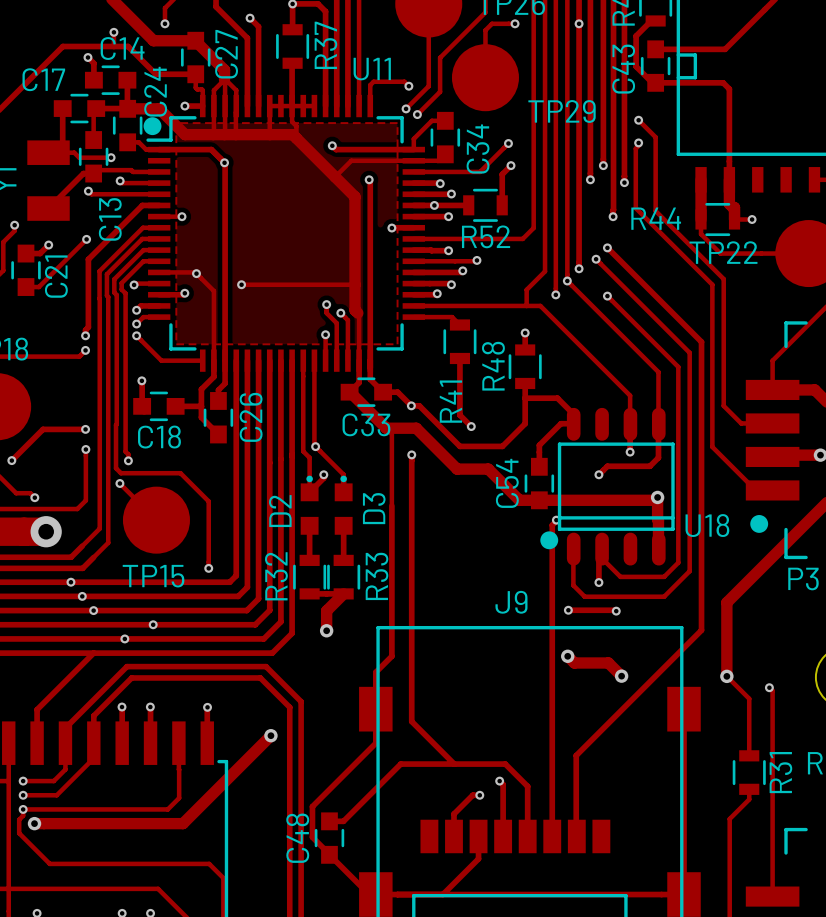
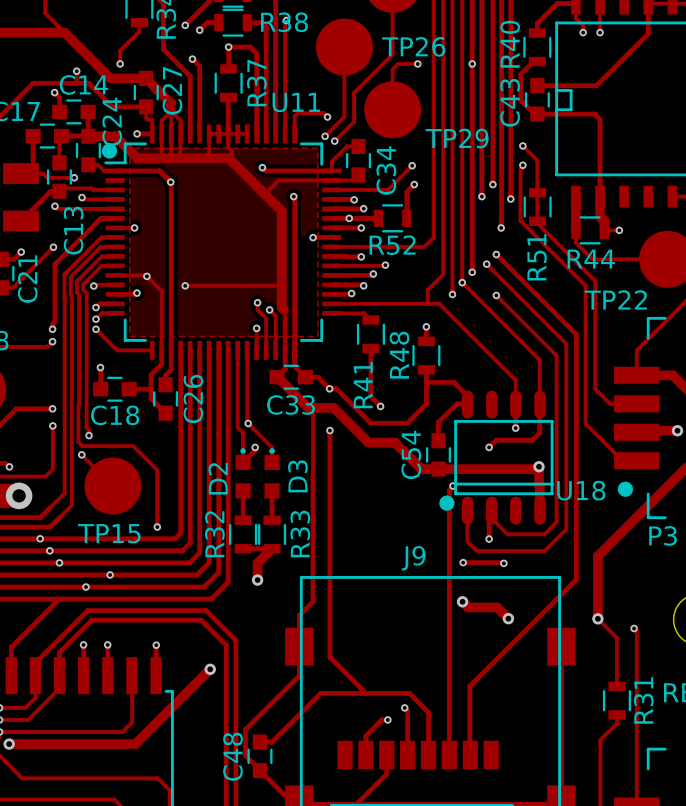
R51: none -> (537, 206)
R44 name position: R44 (656, 218) -> R44 (591, 259)
TP22 name position: TP22 (723, 252) -> TP22 (615, 299)

